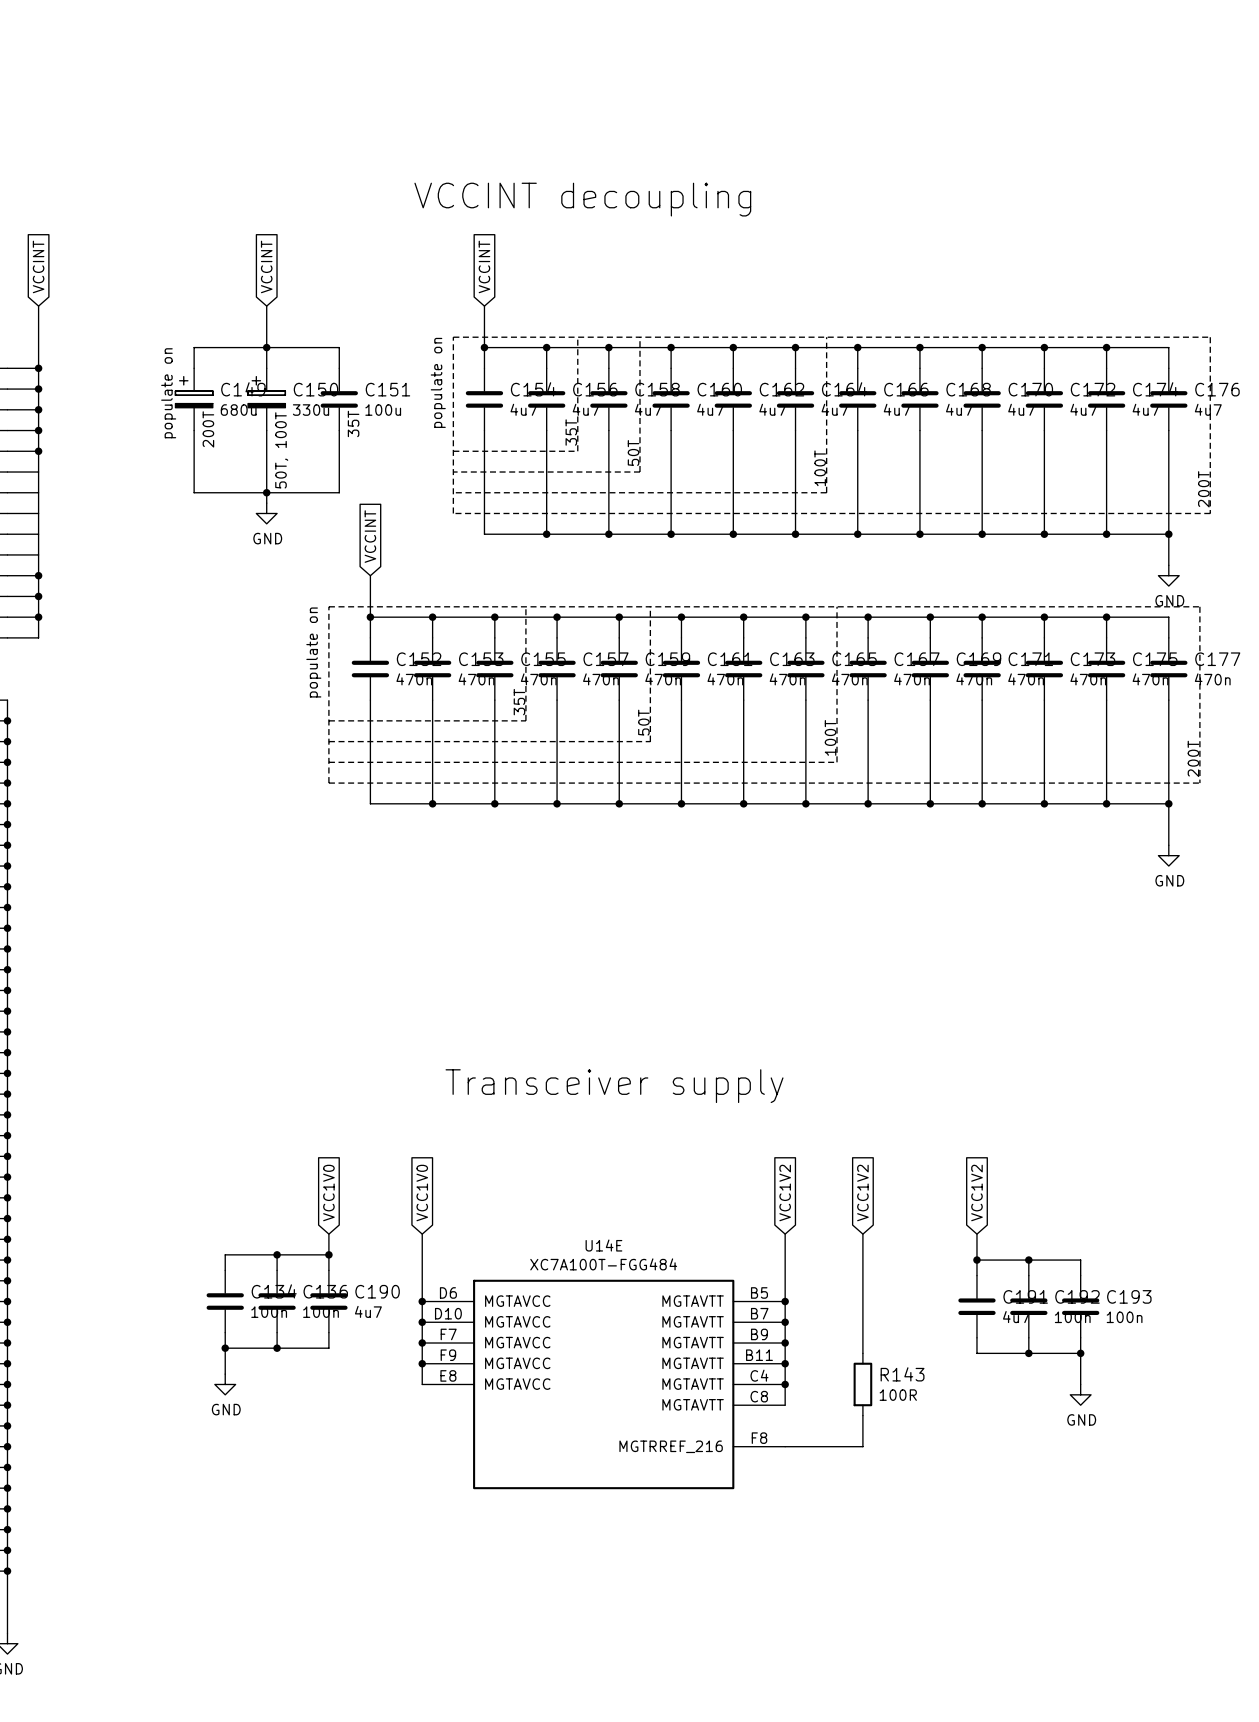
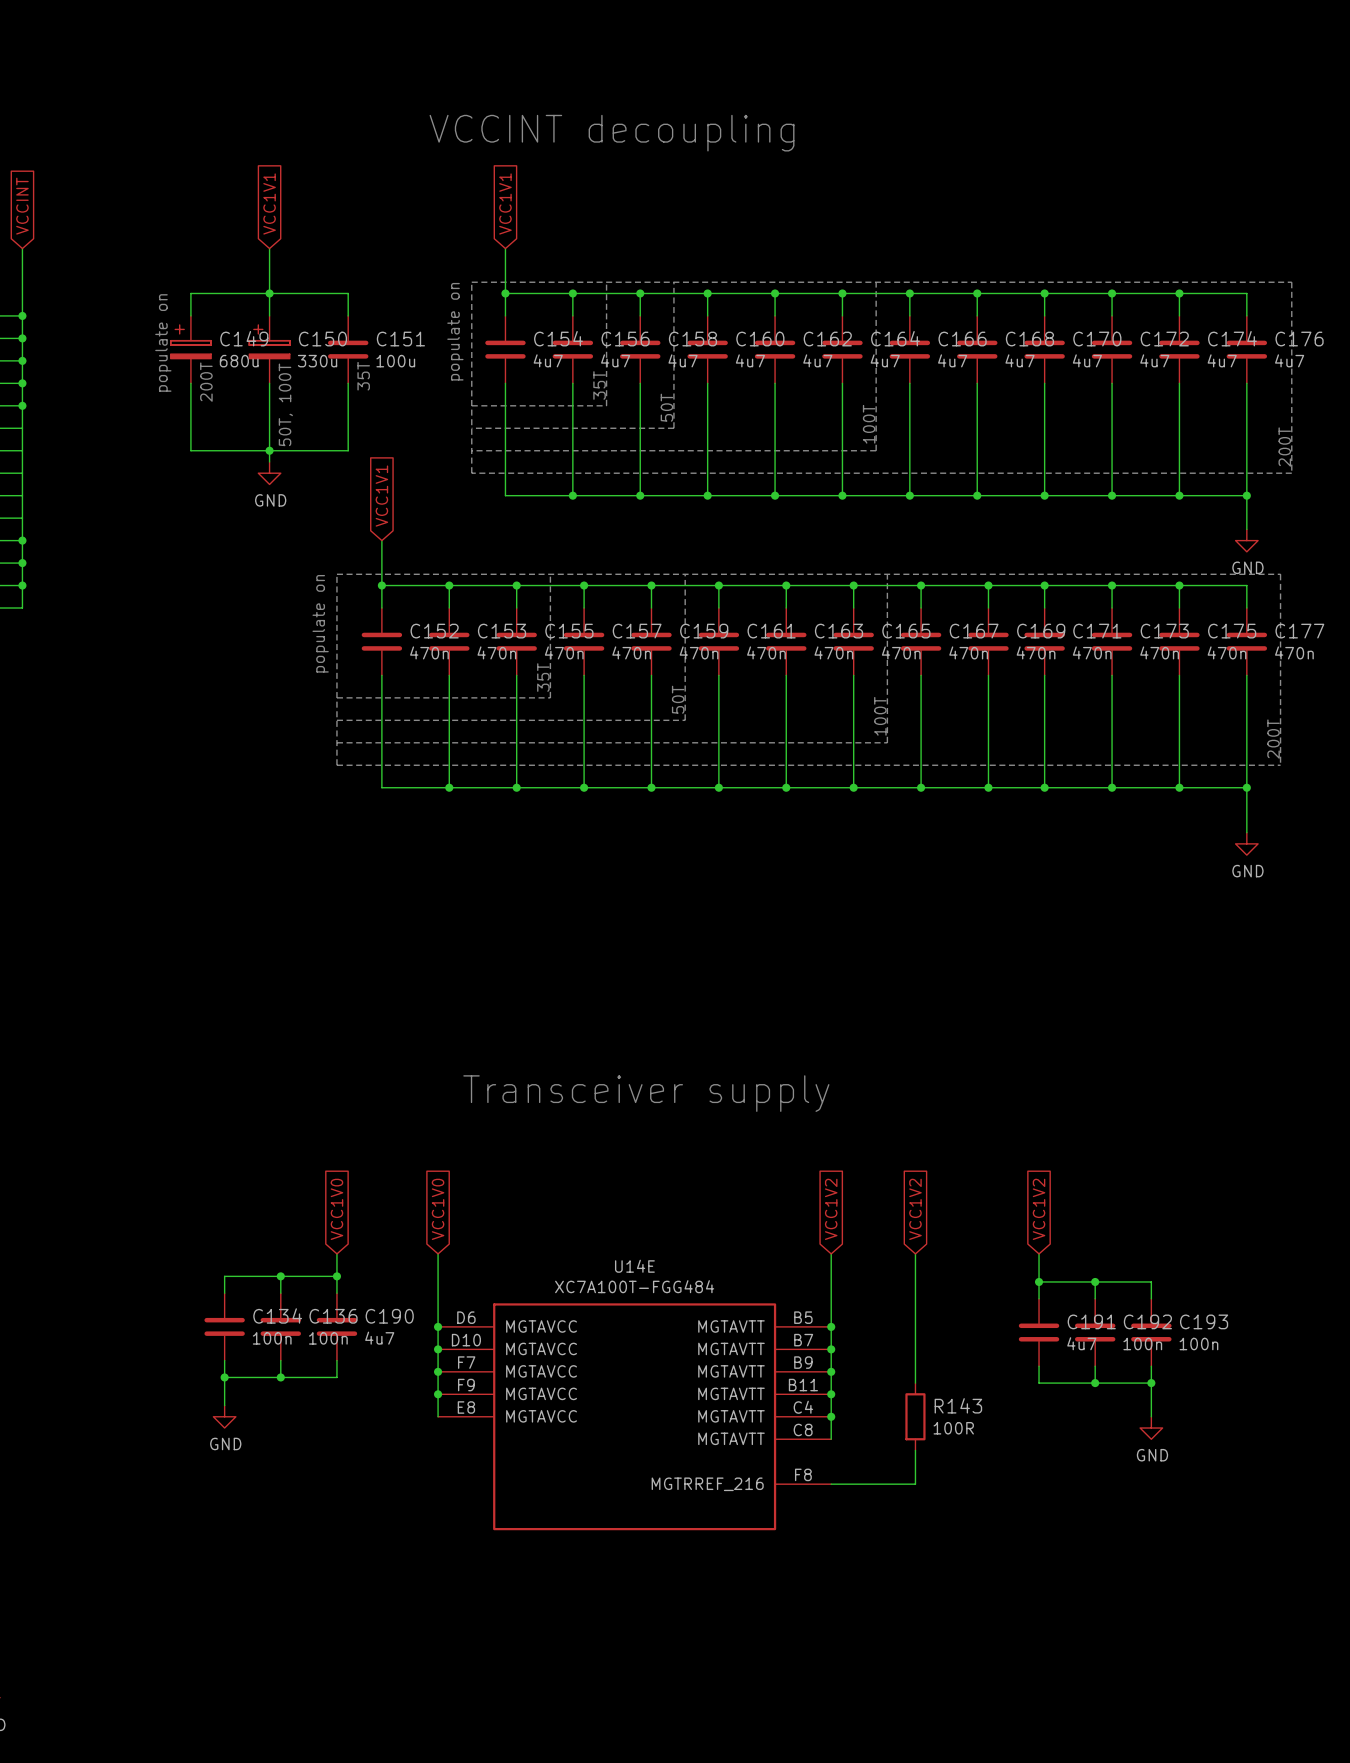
global label: VCCINT (266, 266) -> VCC1V1 (269, 204)
global label: VCCINT (484, 266) -> VCC1V1 (505, 204)
global label: VCCINT (370, 536) -> VCC1V1 (381, 496)

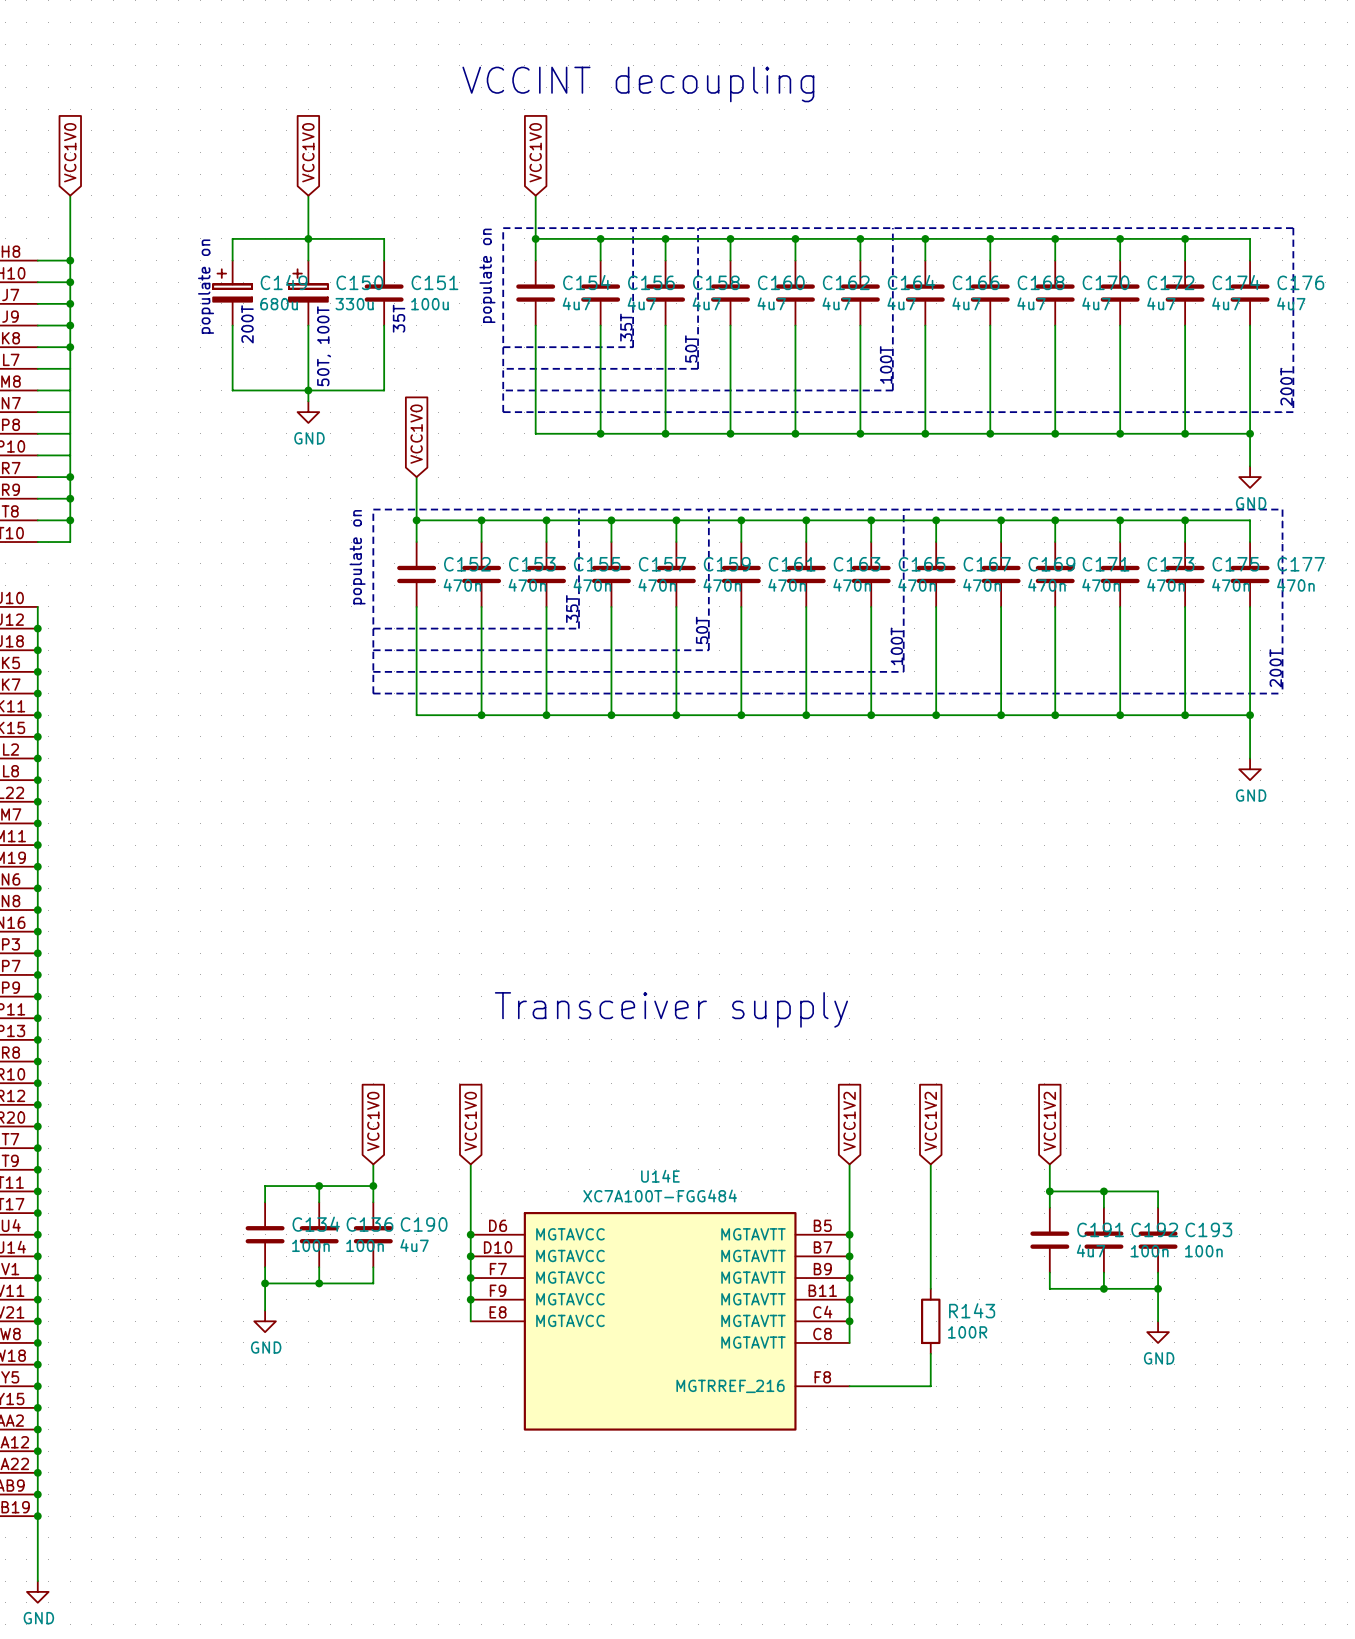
global label: VCC1V1 (269, 204) -> VCC1V0 (308, 152)
global label: VCC1V1 (505, 204) -> VCC1V0 (535, 152)
global label: VCCINT (22, 206) -> VCC1V0 (70, 152)
global label: VCC1V1 (381, 496) -> VCC1V0 (416, 434)

